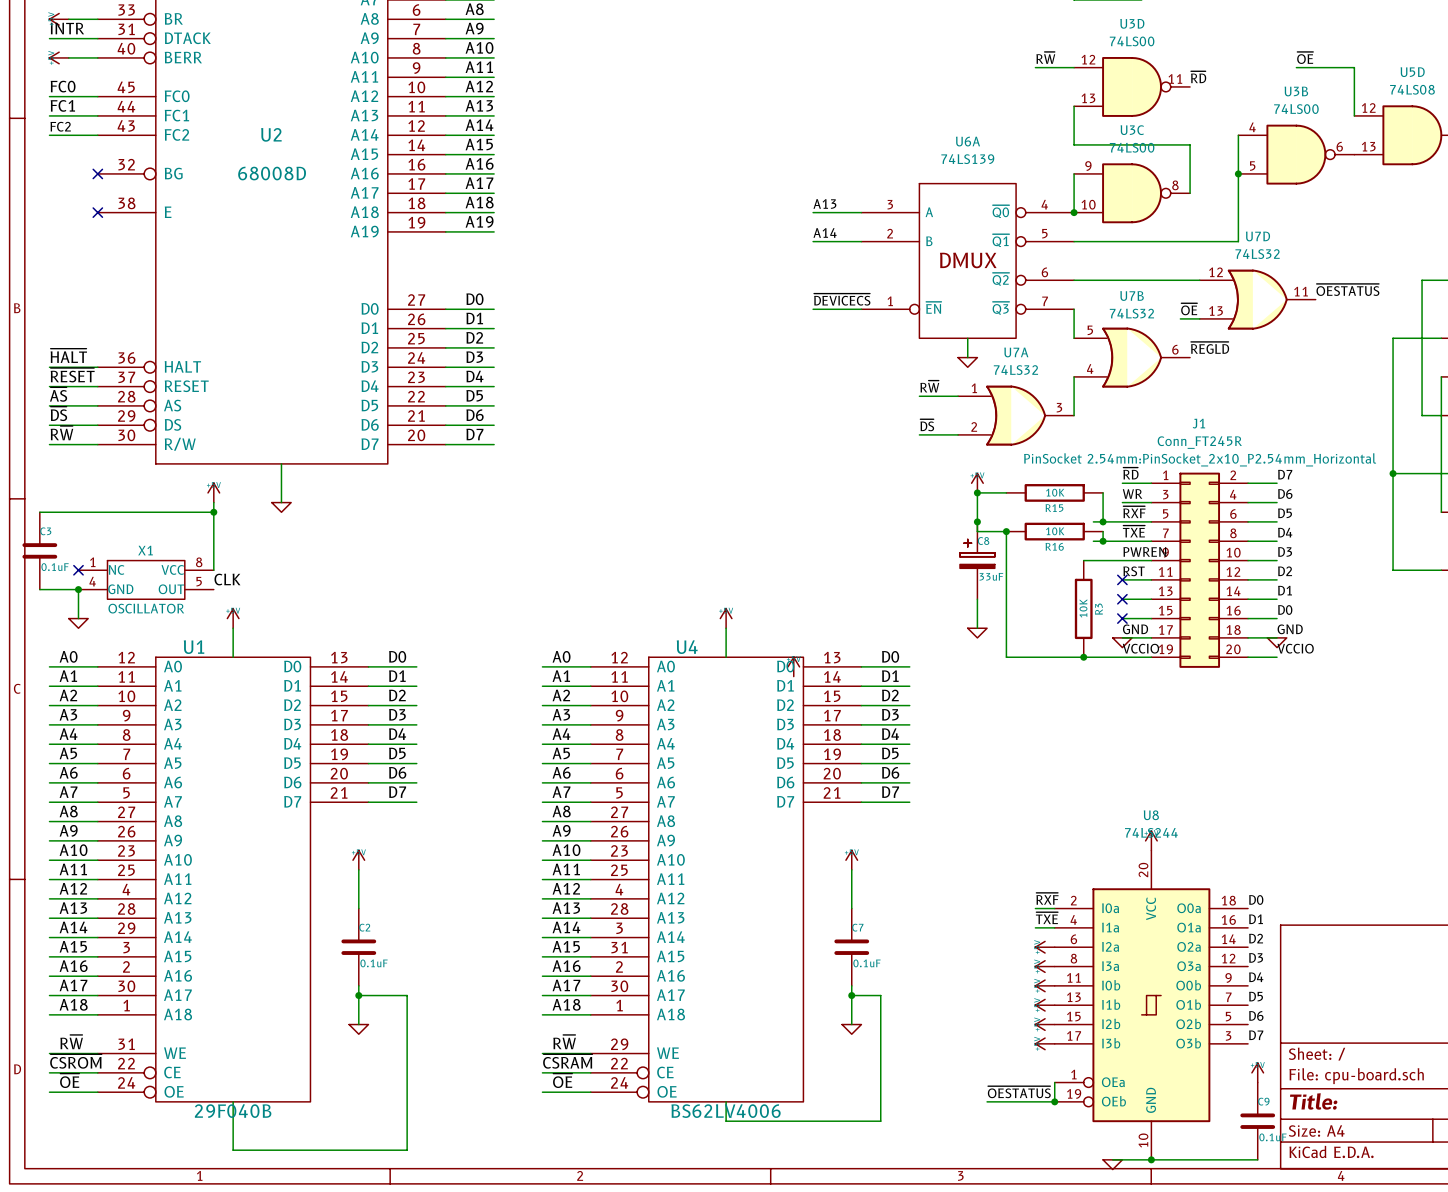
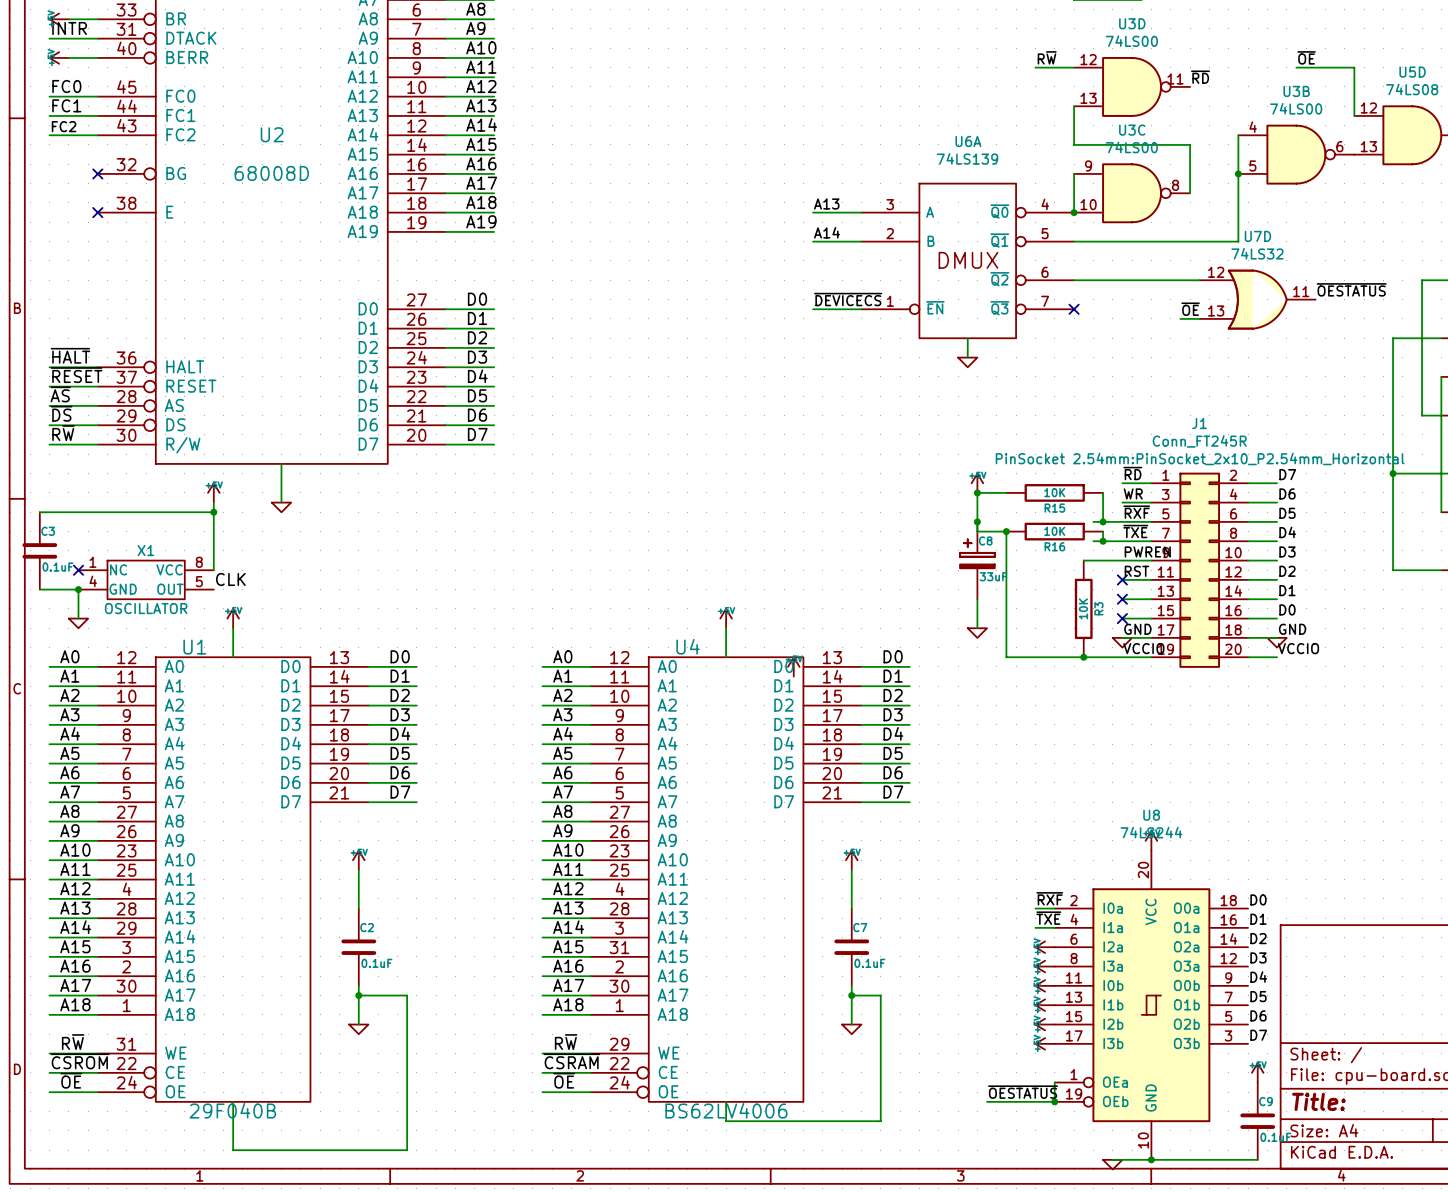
wire: (1074, 309) (1074, 338) -> none
no-connect mark: none -> (1074, 309)
label: ~{REGLD} (1210, 347) -> none
U7B: 74LS32 (1132, 357) -> none
wire: (1074, 376) (1074, 415) -> none
label: R~{W} (929, 386) -> none
wire: (919, 396) (958, 396) -> none
U7A: 74LS32 (1016, 415) -> none
label: ~{DS} (927, 425) -> none
wire: (919, 434) (958, 434) -> none

